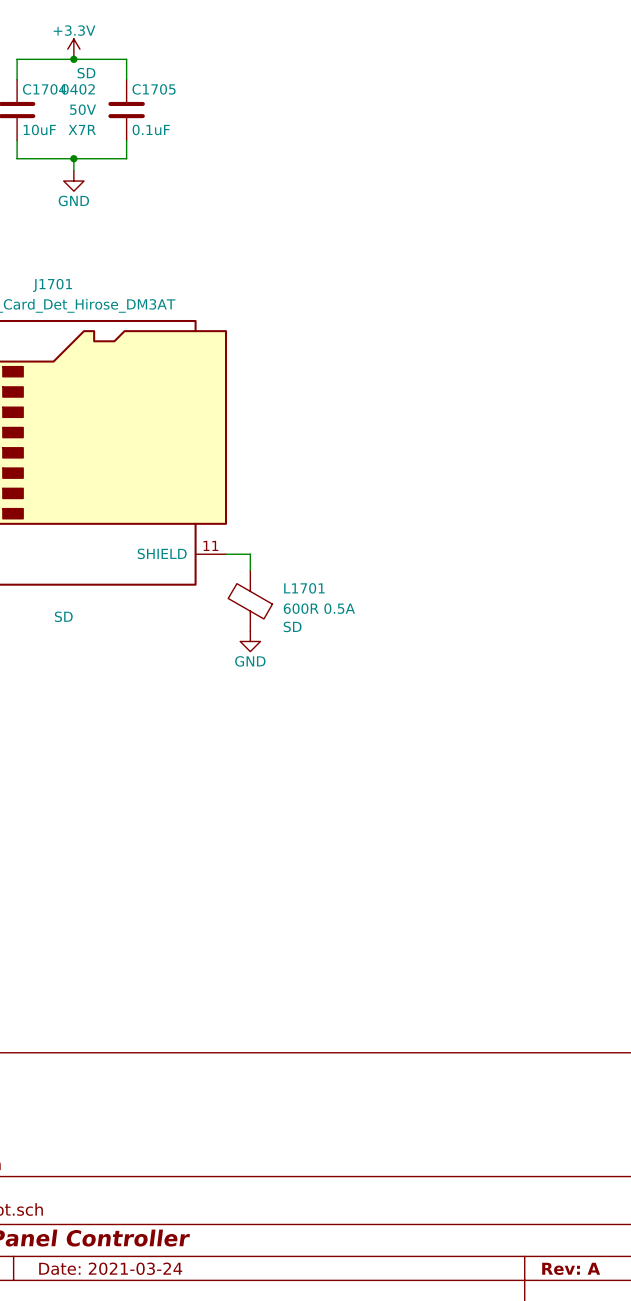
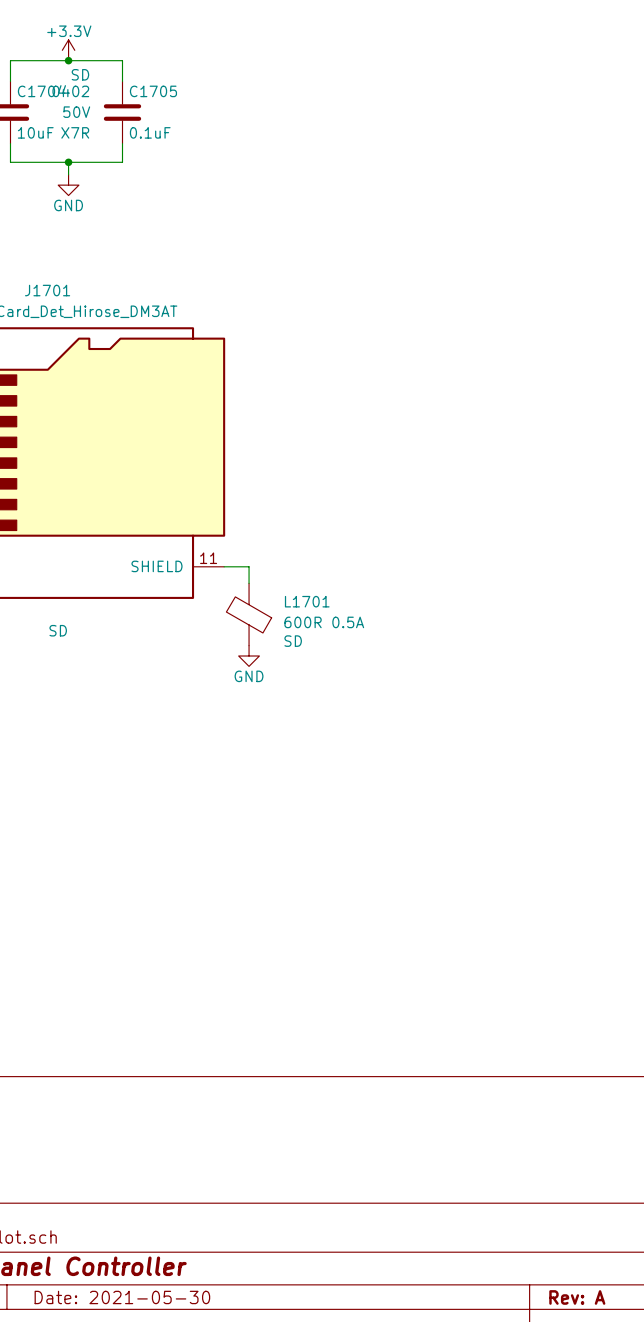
title block: Date: 2021-03-24 (110, 1268) -> Date: 2021-05-30 (122, 1297)

